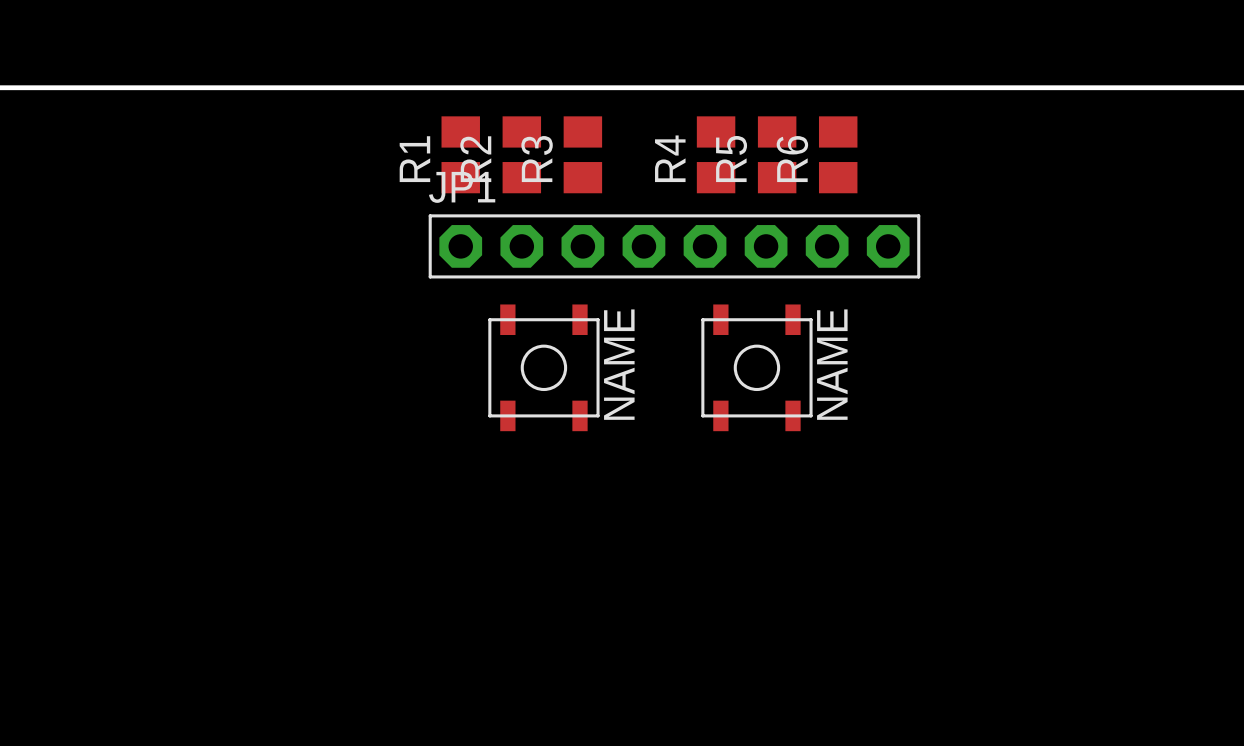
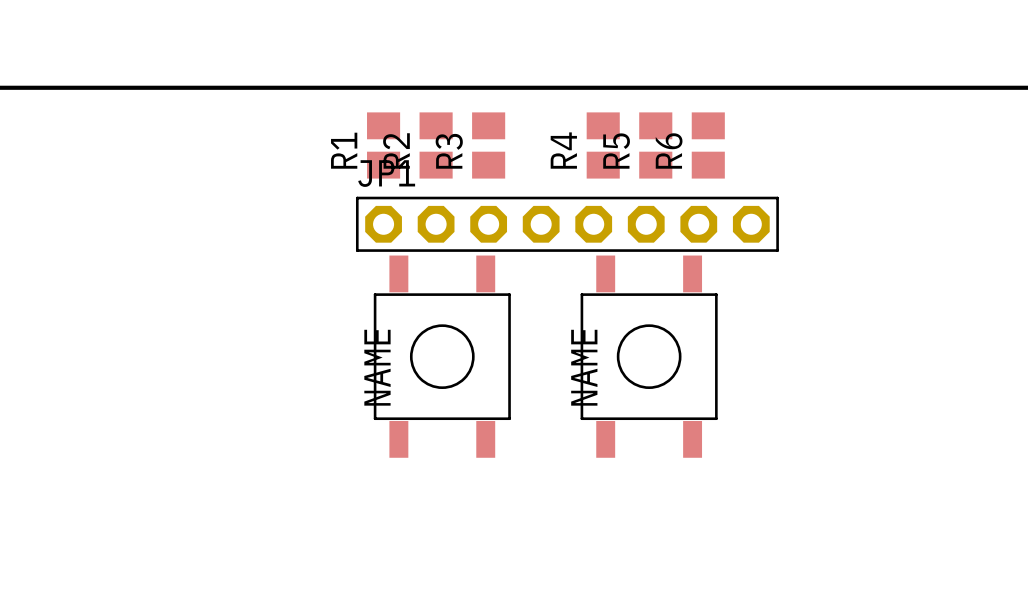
part: (543, 367) -> none
part: (756, 367) -> none
part: none -> (442, 356)
part: none -> (649, 356)

